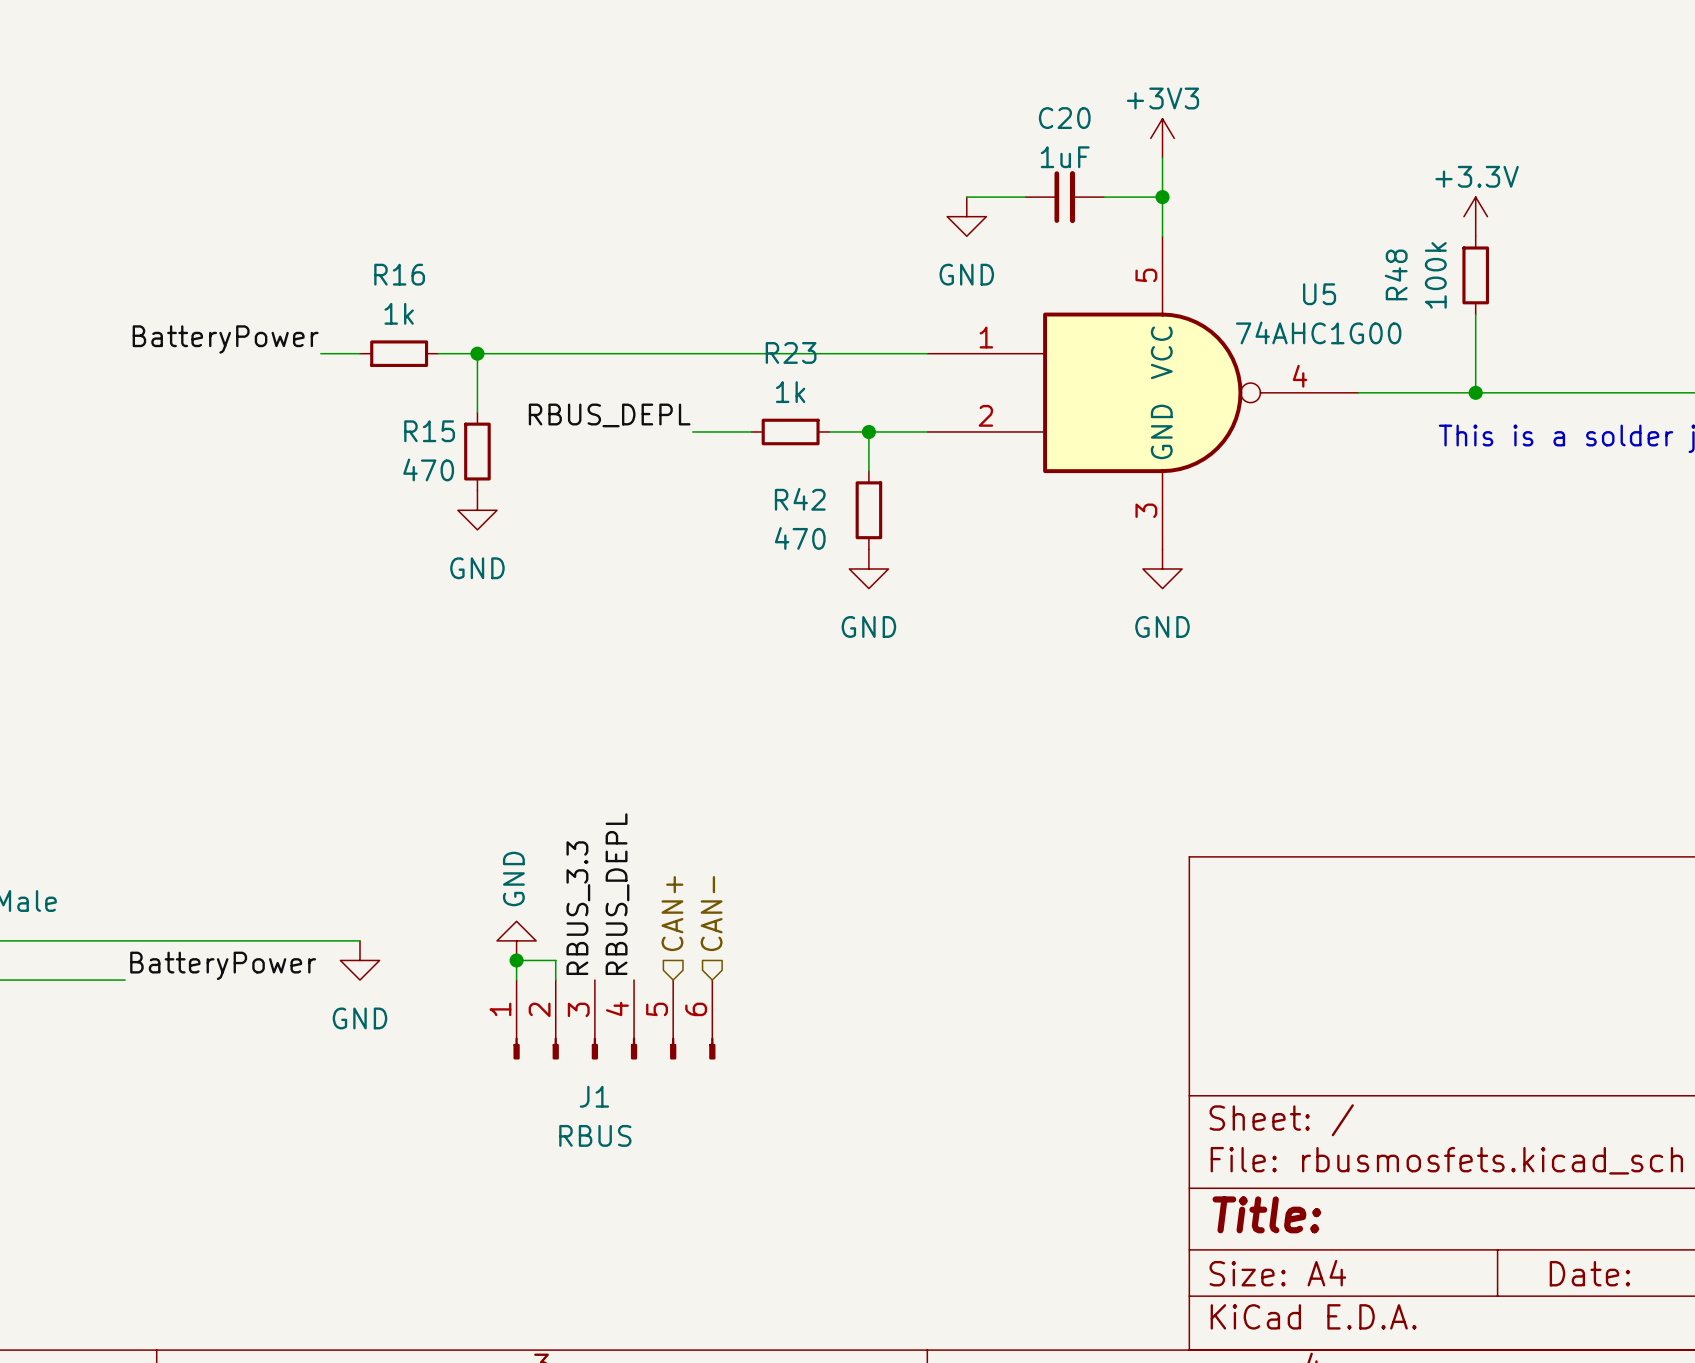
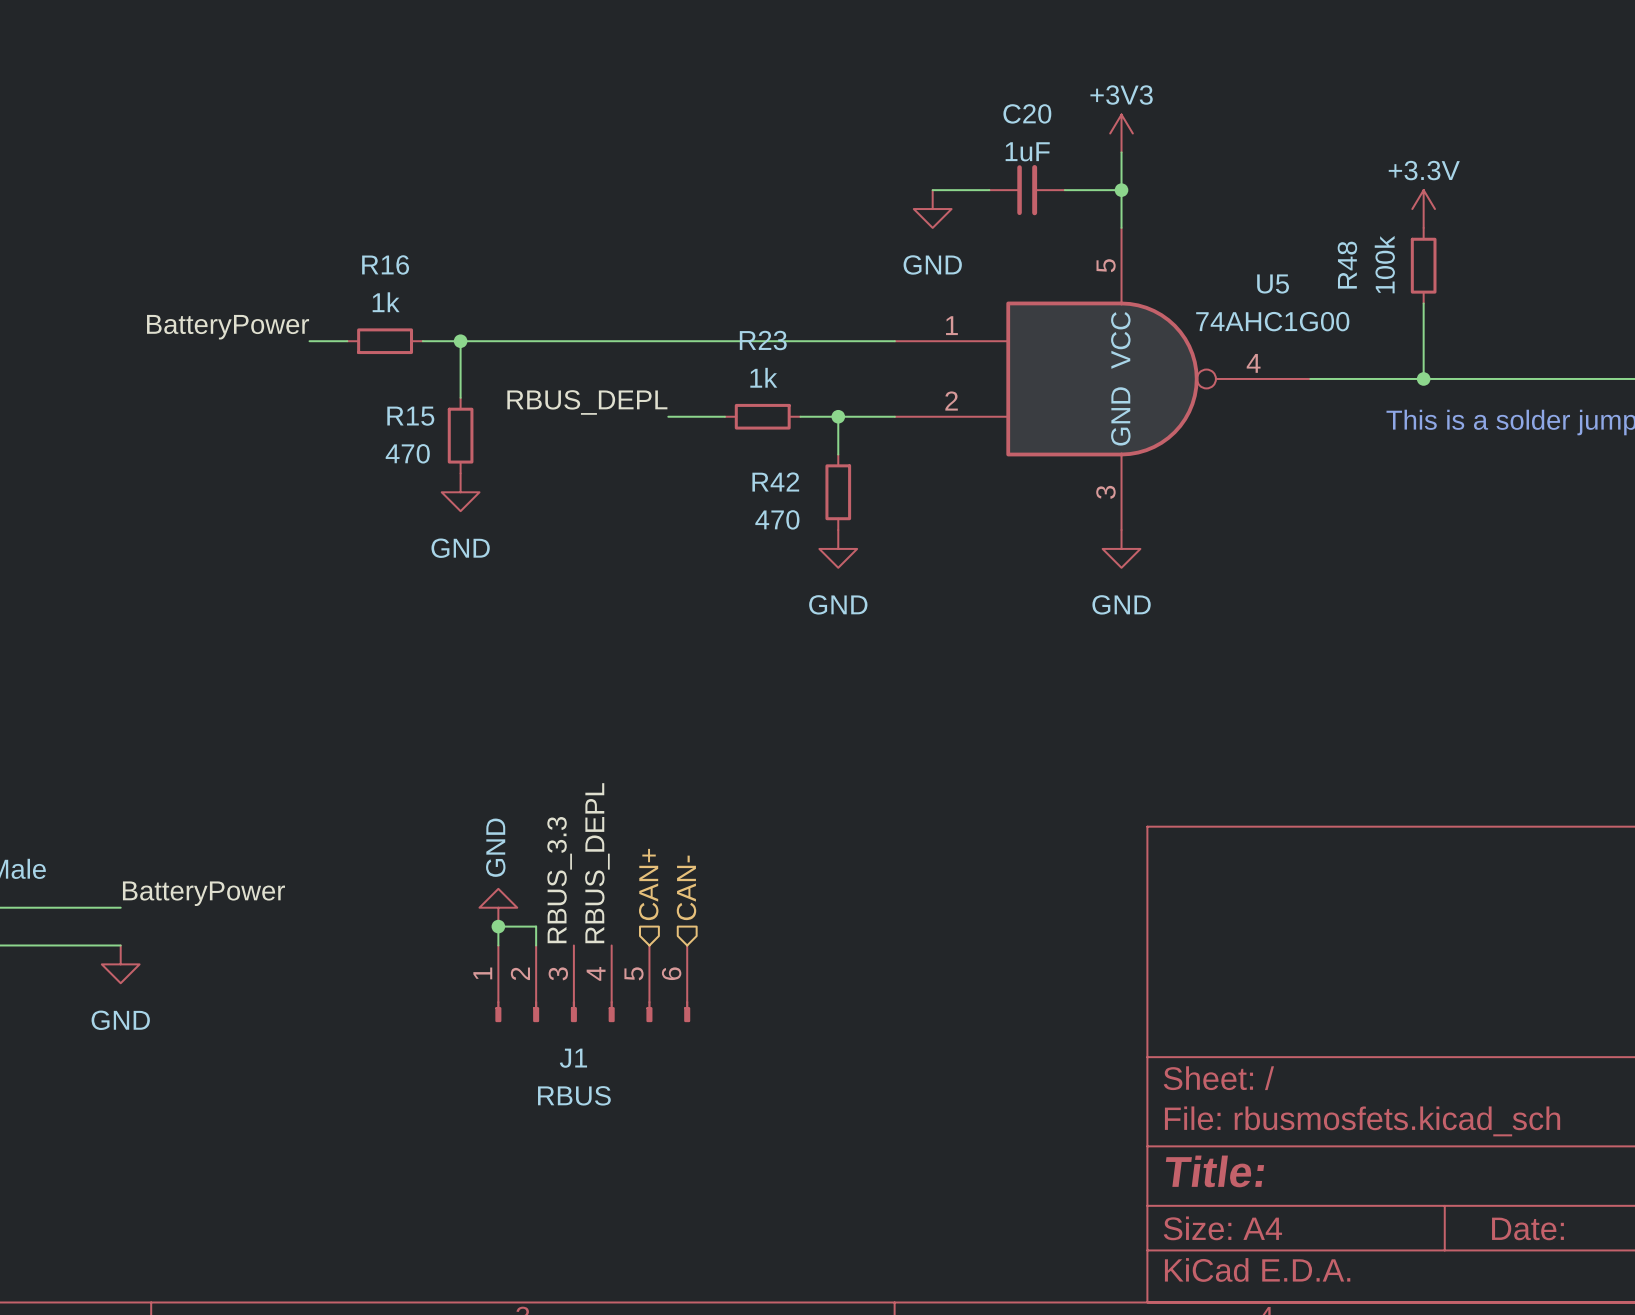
wire: (125, 940) (360, 940) -> none
power symbol position: GND (360, 960) -> GND (120, 964)
label position: BatteryPower (223, 965) -> BatteryPower (203, 893)

